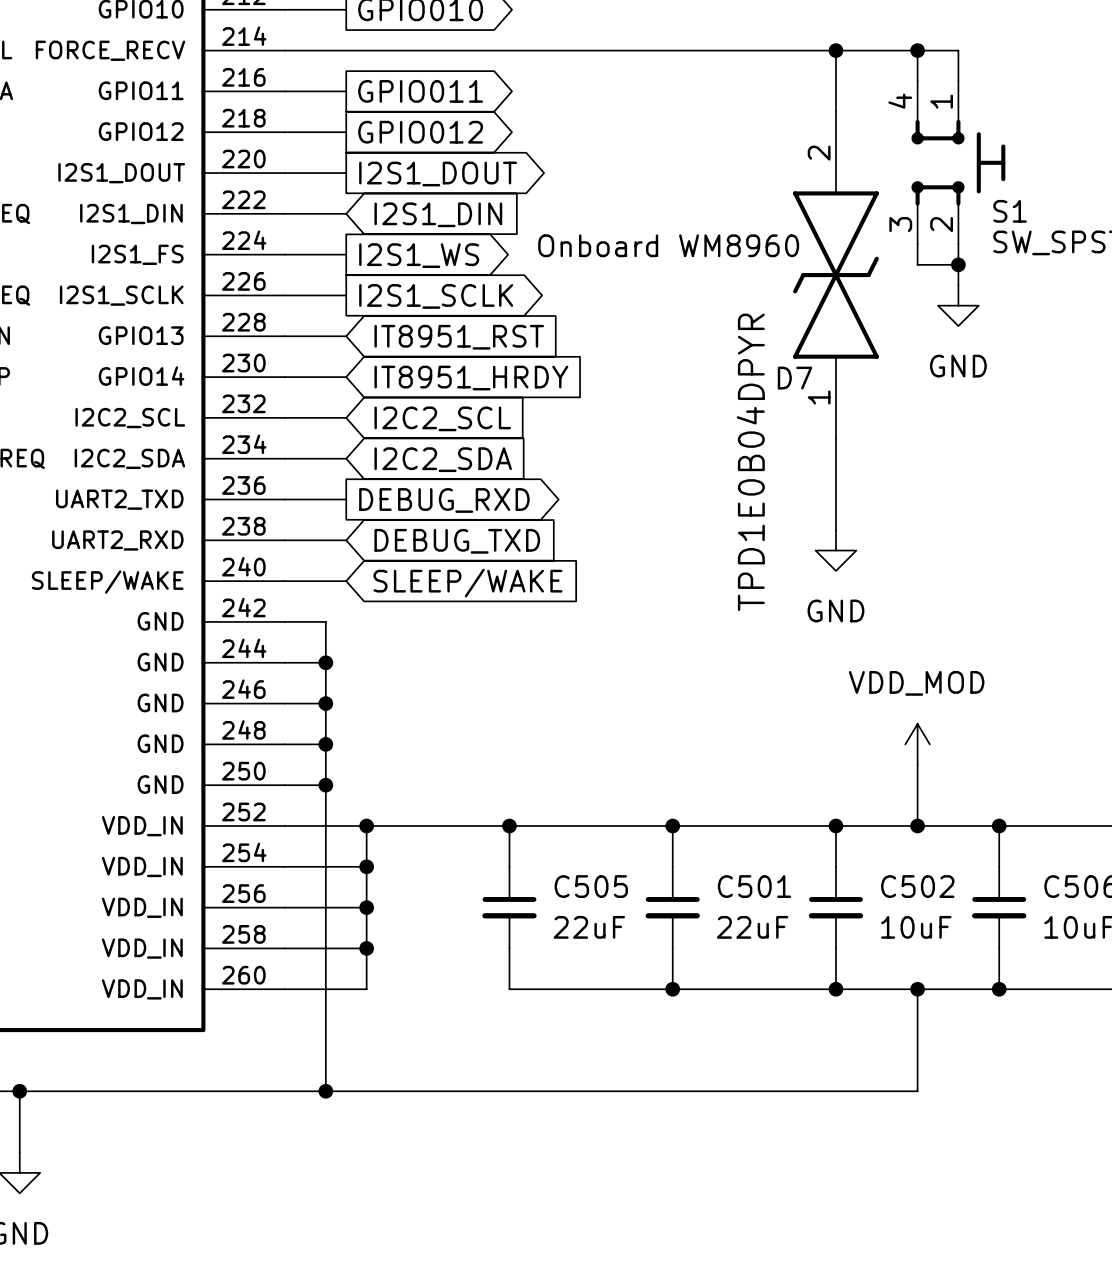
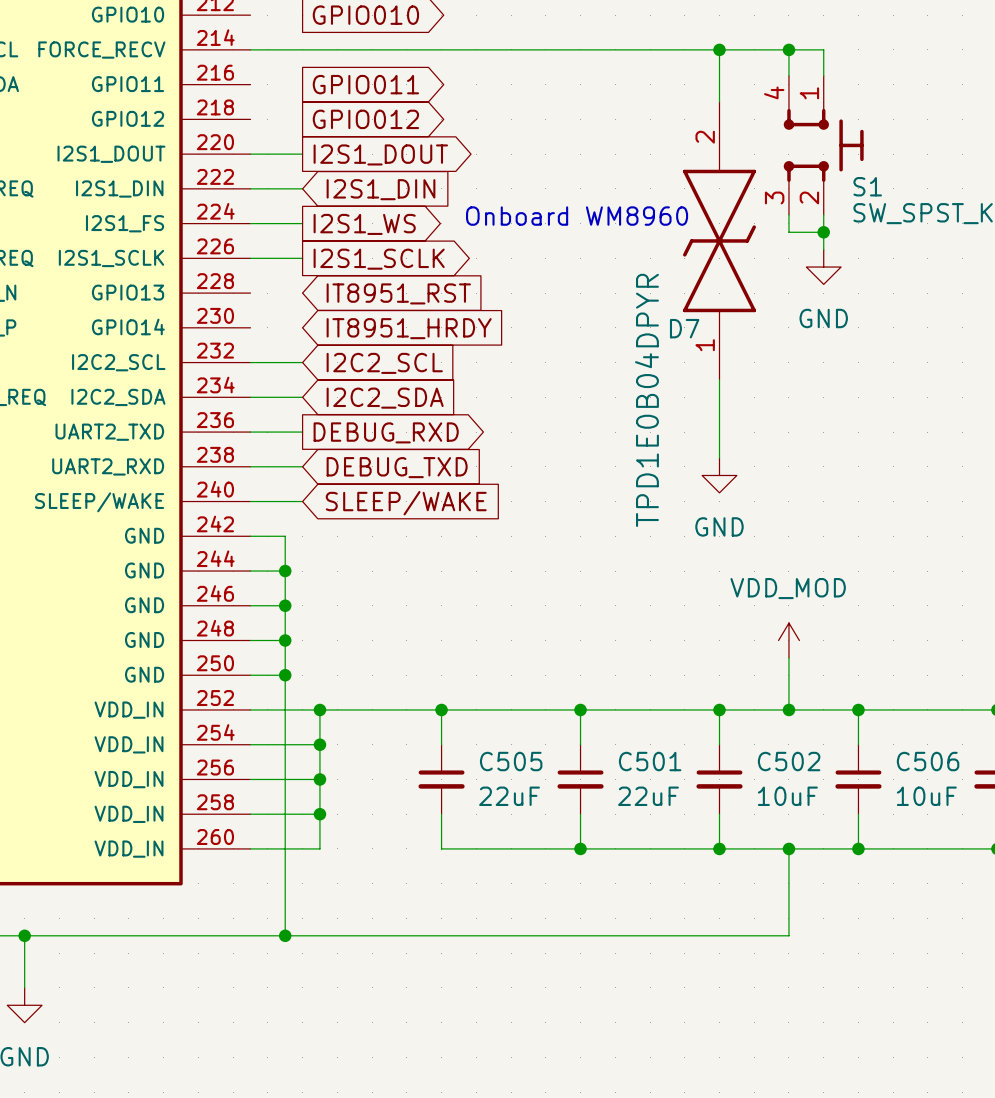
wire: (285, 9) (346, 9) -> none
wire: (285, 91) (346, 91) -> none
wire: (285, 132) (346, 132) -> none
wire: (285, 336) (346, 336) -> none
wire: (285, 377) (346, 377) -> none

